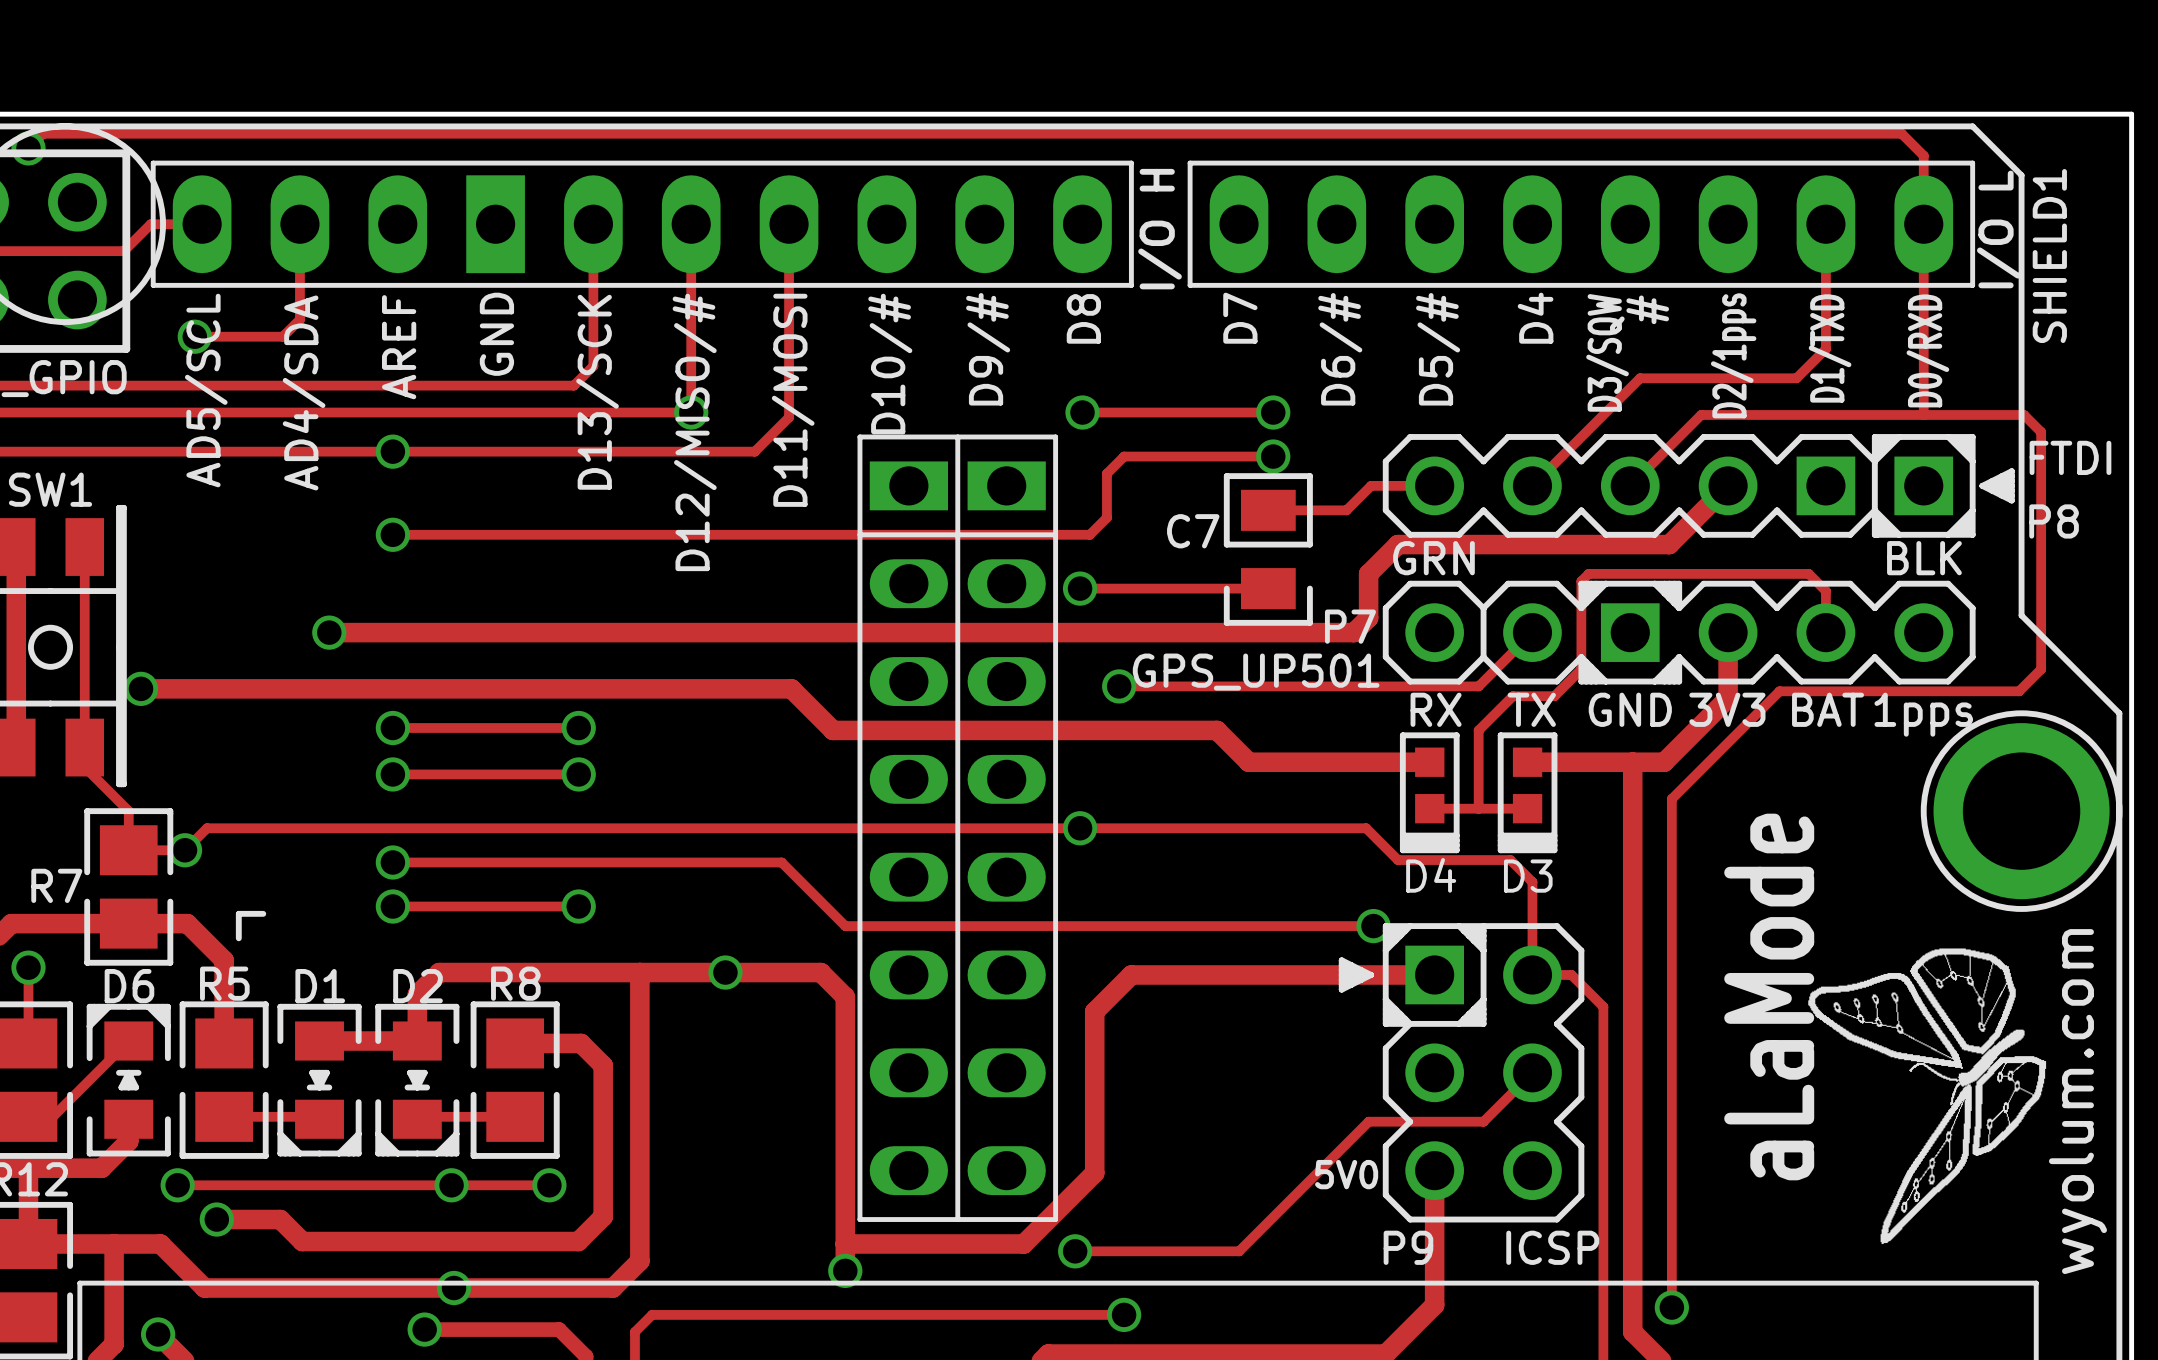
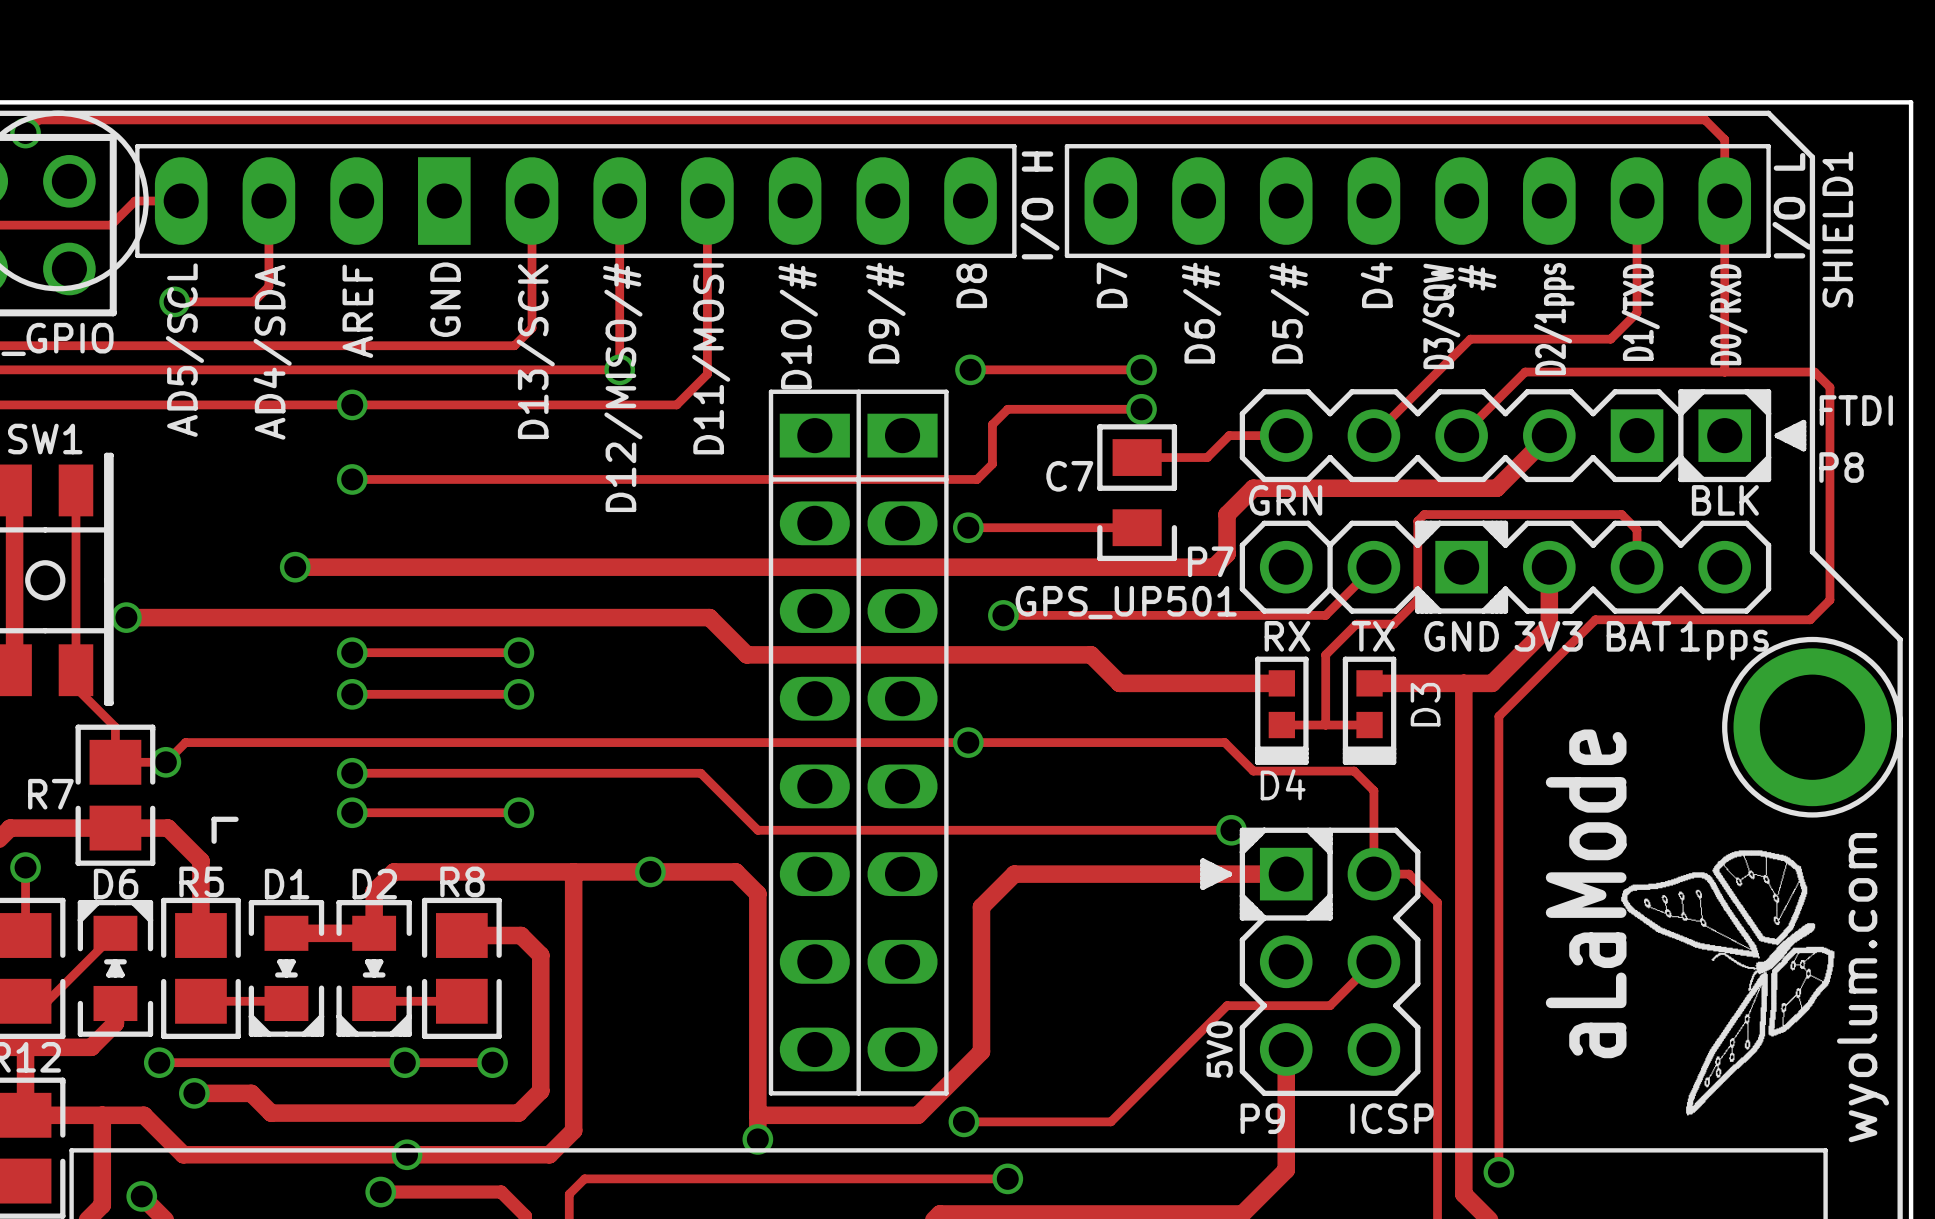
D3 name rotation: 0° (1528, 876) -> 90° counterclockwise (1425, 704)
D3 name position: D3 (1528, 876) -> D3 (1425, 704)
P9 text rotation: 0° (1346, 1174) -> 90° counterclockwise (1219, 1049)

